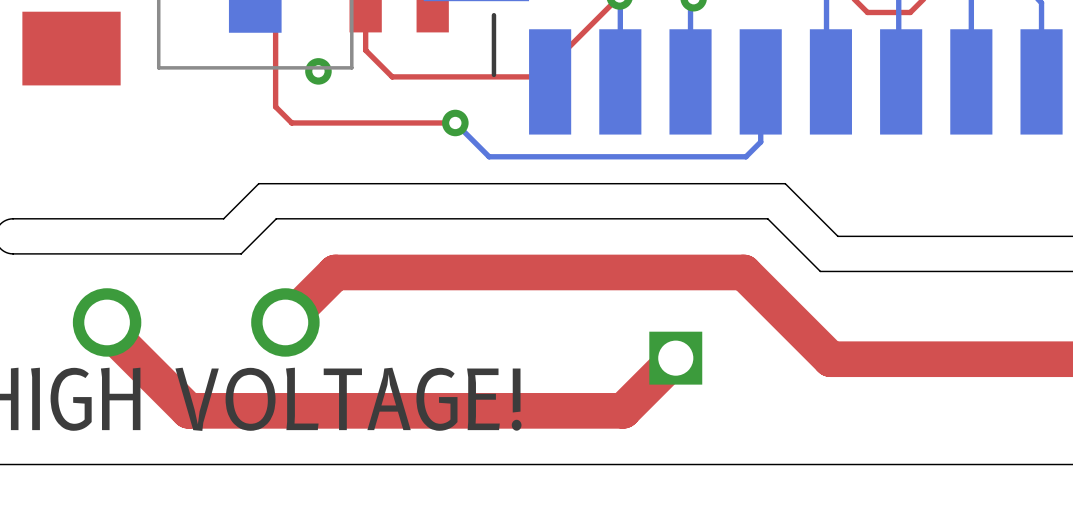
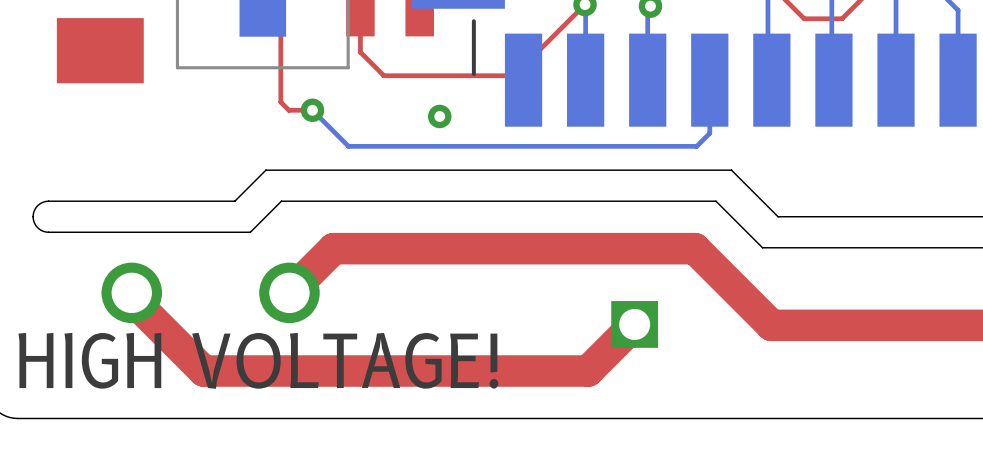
via position: (318, 71) -> (312, 110)
top track: (284, 115) (291, 122) (455, 122) -> (288, 110) (312, 110)
bottom track: (455, 122) (489, 156) -> (312, 110) (348, 146) (469, 146)

